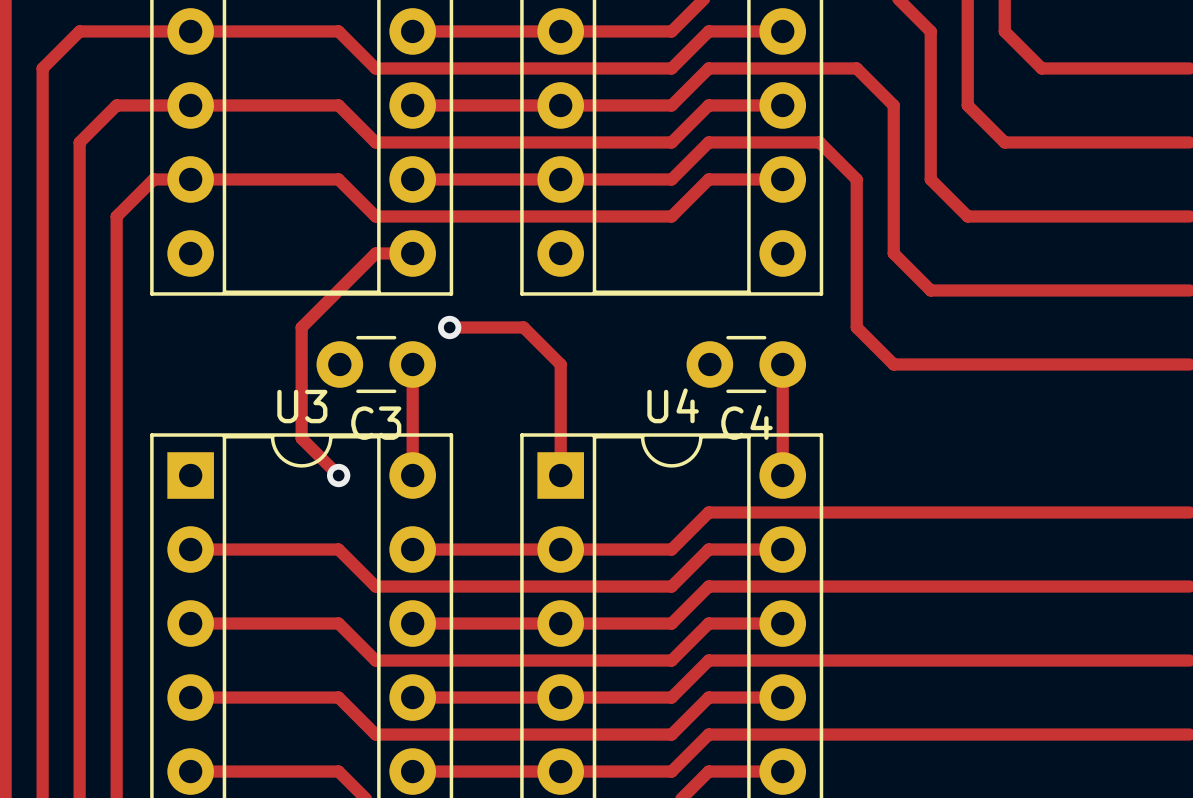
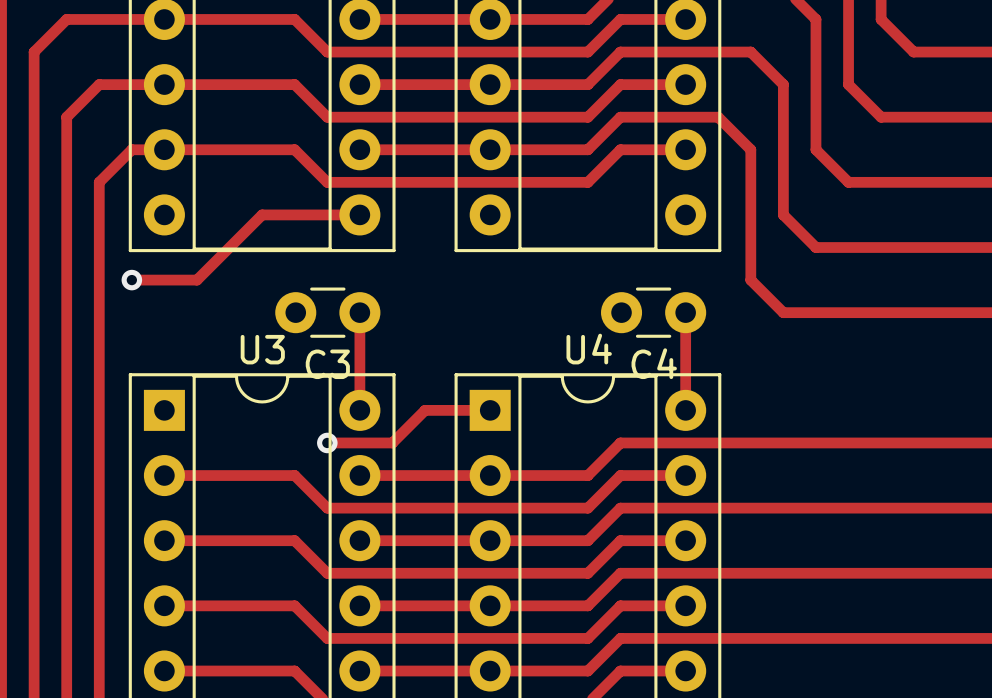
track: (375, 253) (301, 327) (301, 438) (338, 475) -> (327, 214) (262, 214) (197, 280) (131, 280)
via: none -> (131, 280)
track: (449, 327) (523, 327) (560, 364) (560, 475) -> (327, 442) (392, 442) (425, 410) (490, 410)
via: (449, 327) -> none
via position: (338, 475) -> (327, 442)

